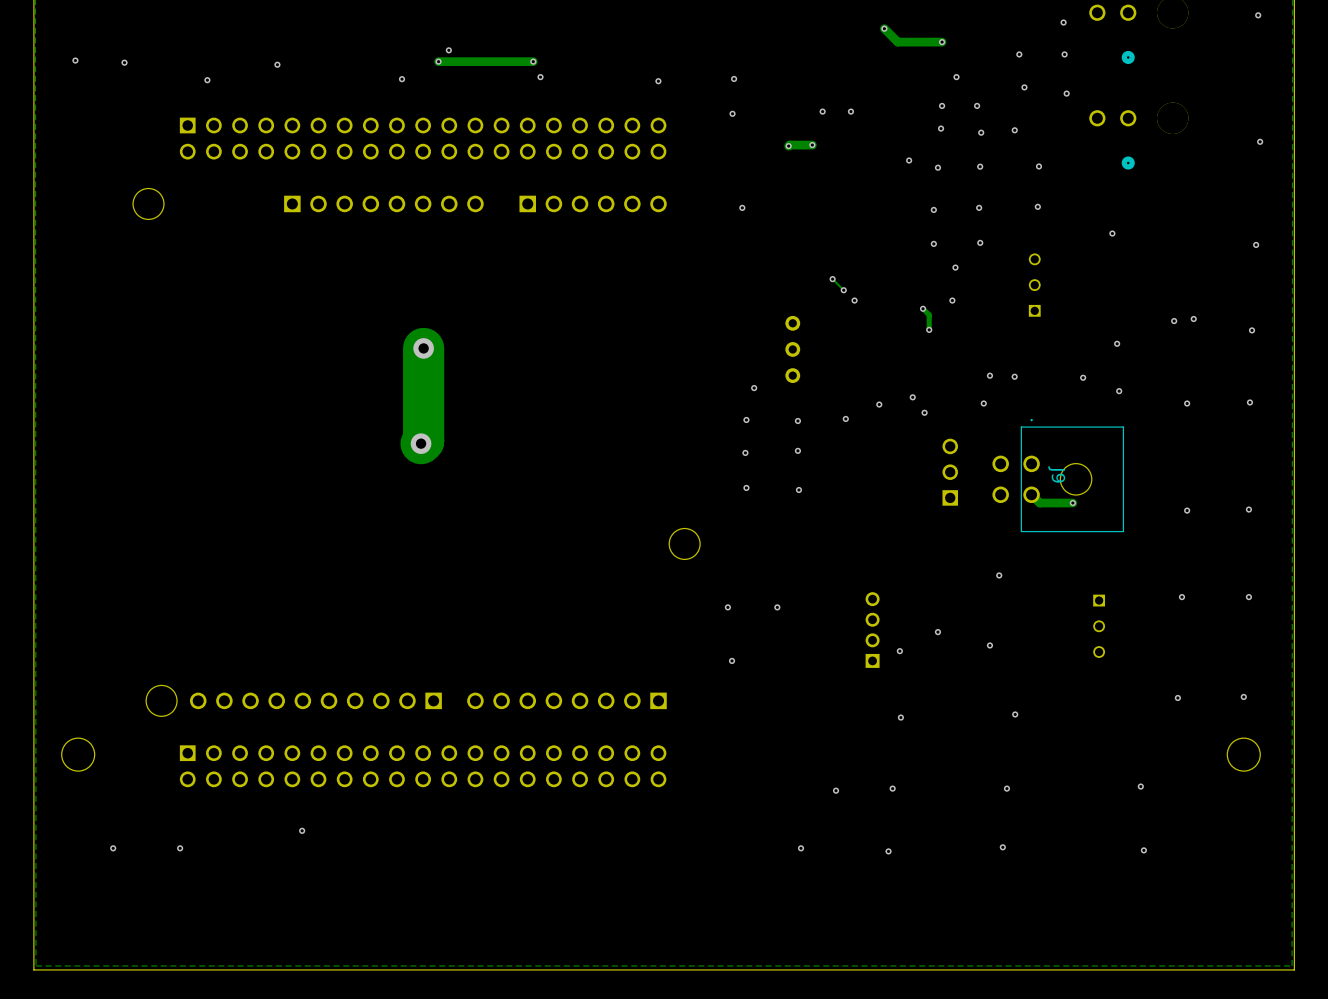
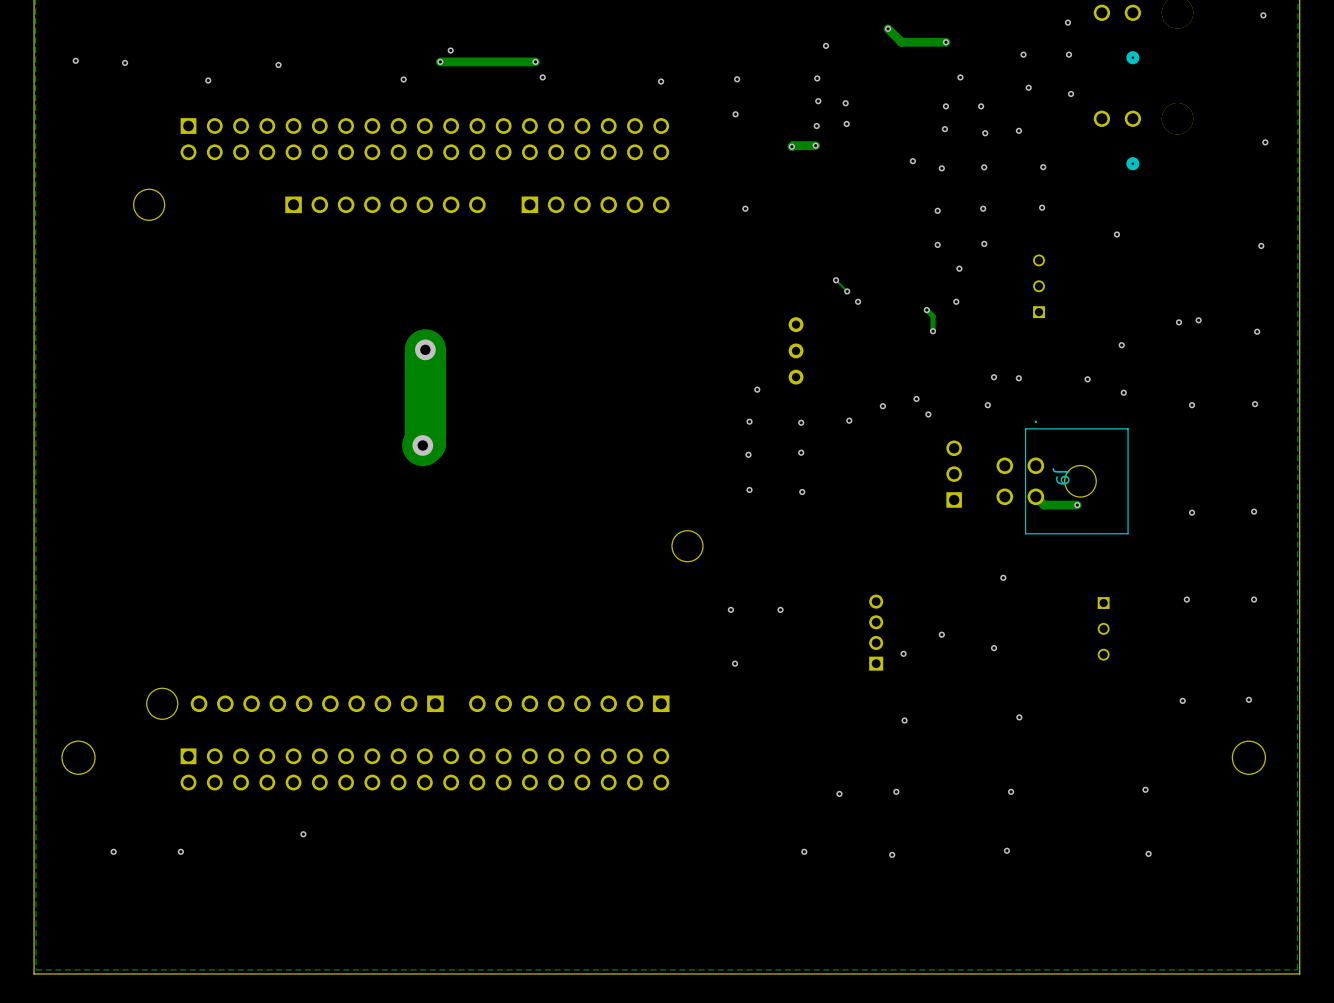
via: none -> (826, 45)
via: none -> (817, 78)
via: none -> (818, 101)
via: none -> (845, 103)
via: (822, 111) -> none
via: (850, 111) -> none
via: none -> (846, 123)
via: none -> (816, 126)

